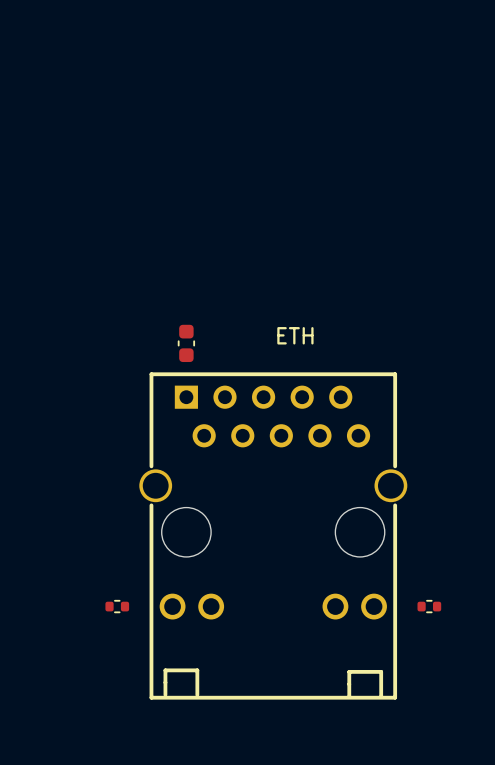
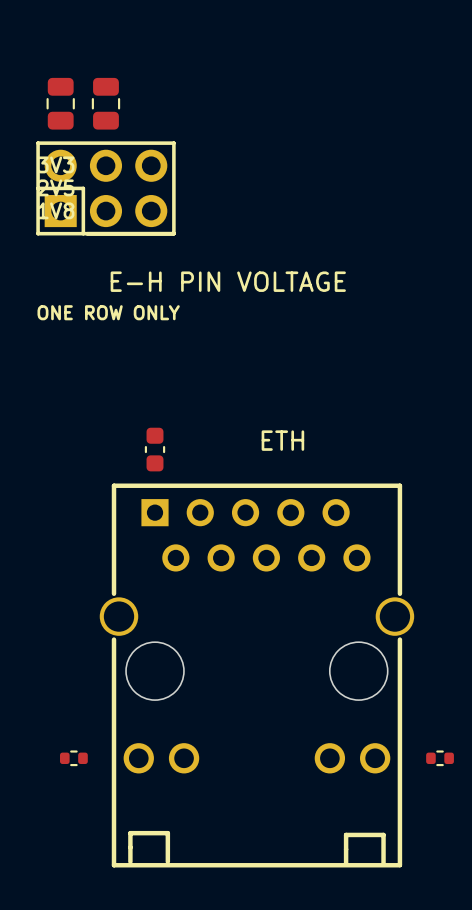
part: none -> (60, 103)
part: none -> (105, 103)
part: none -> (105, 188)

